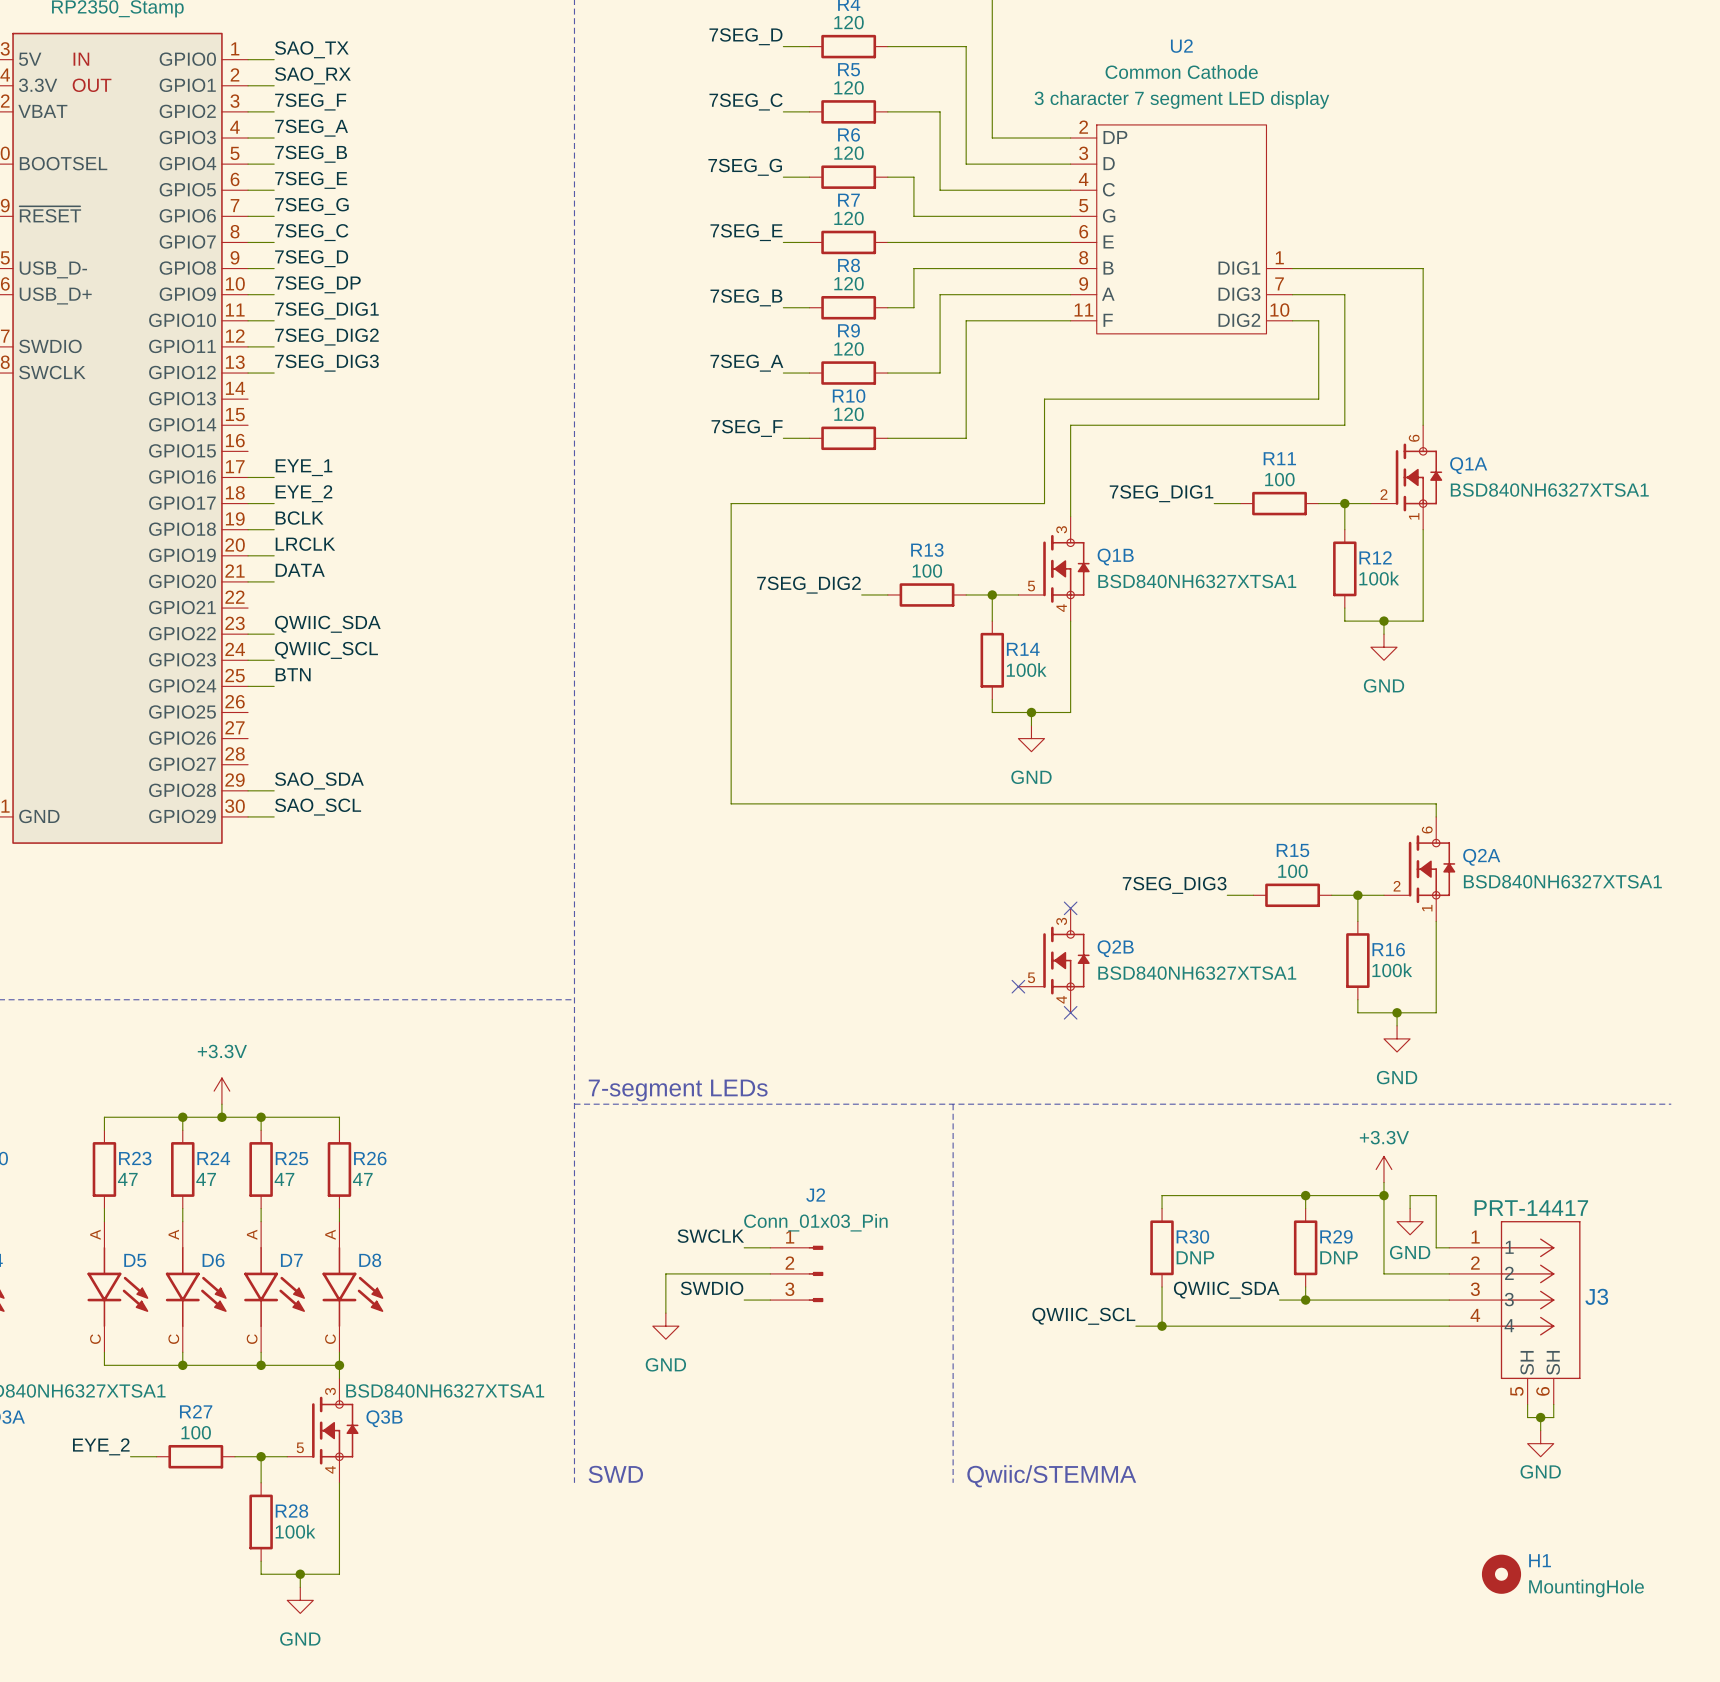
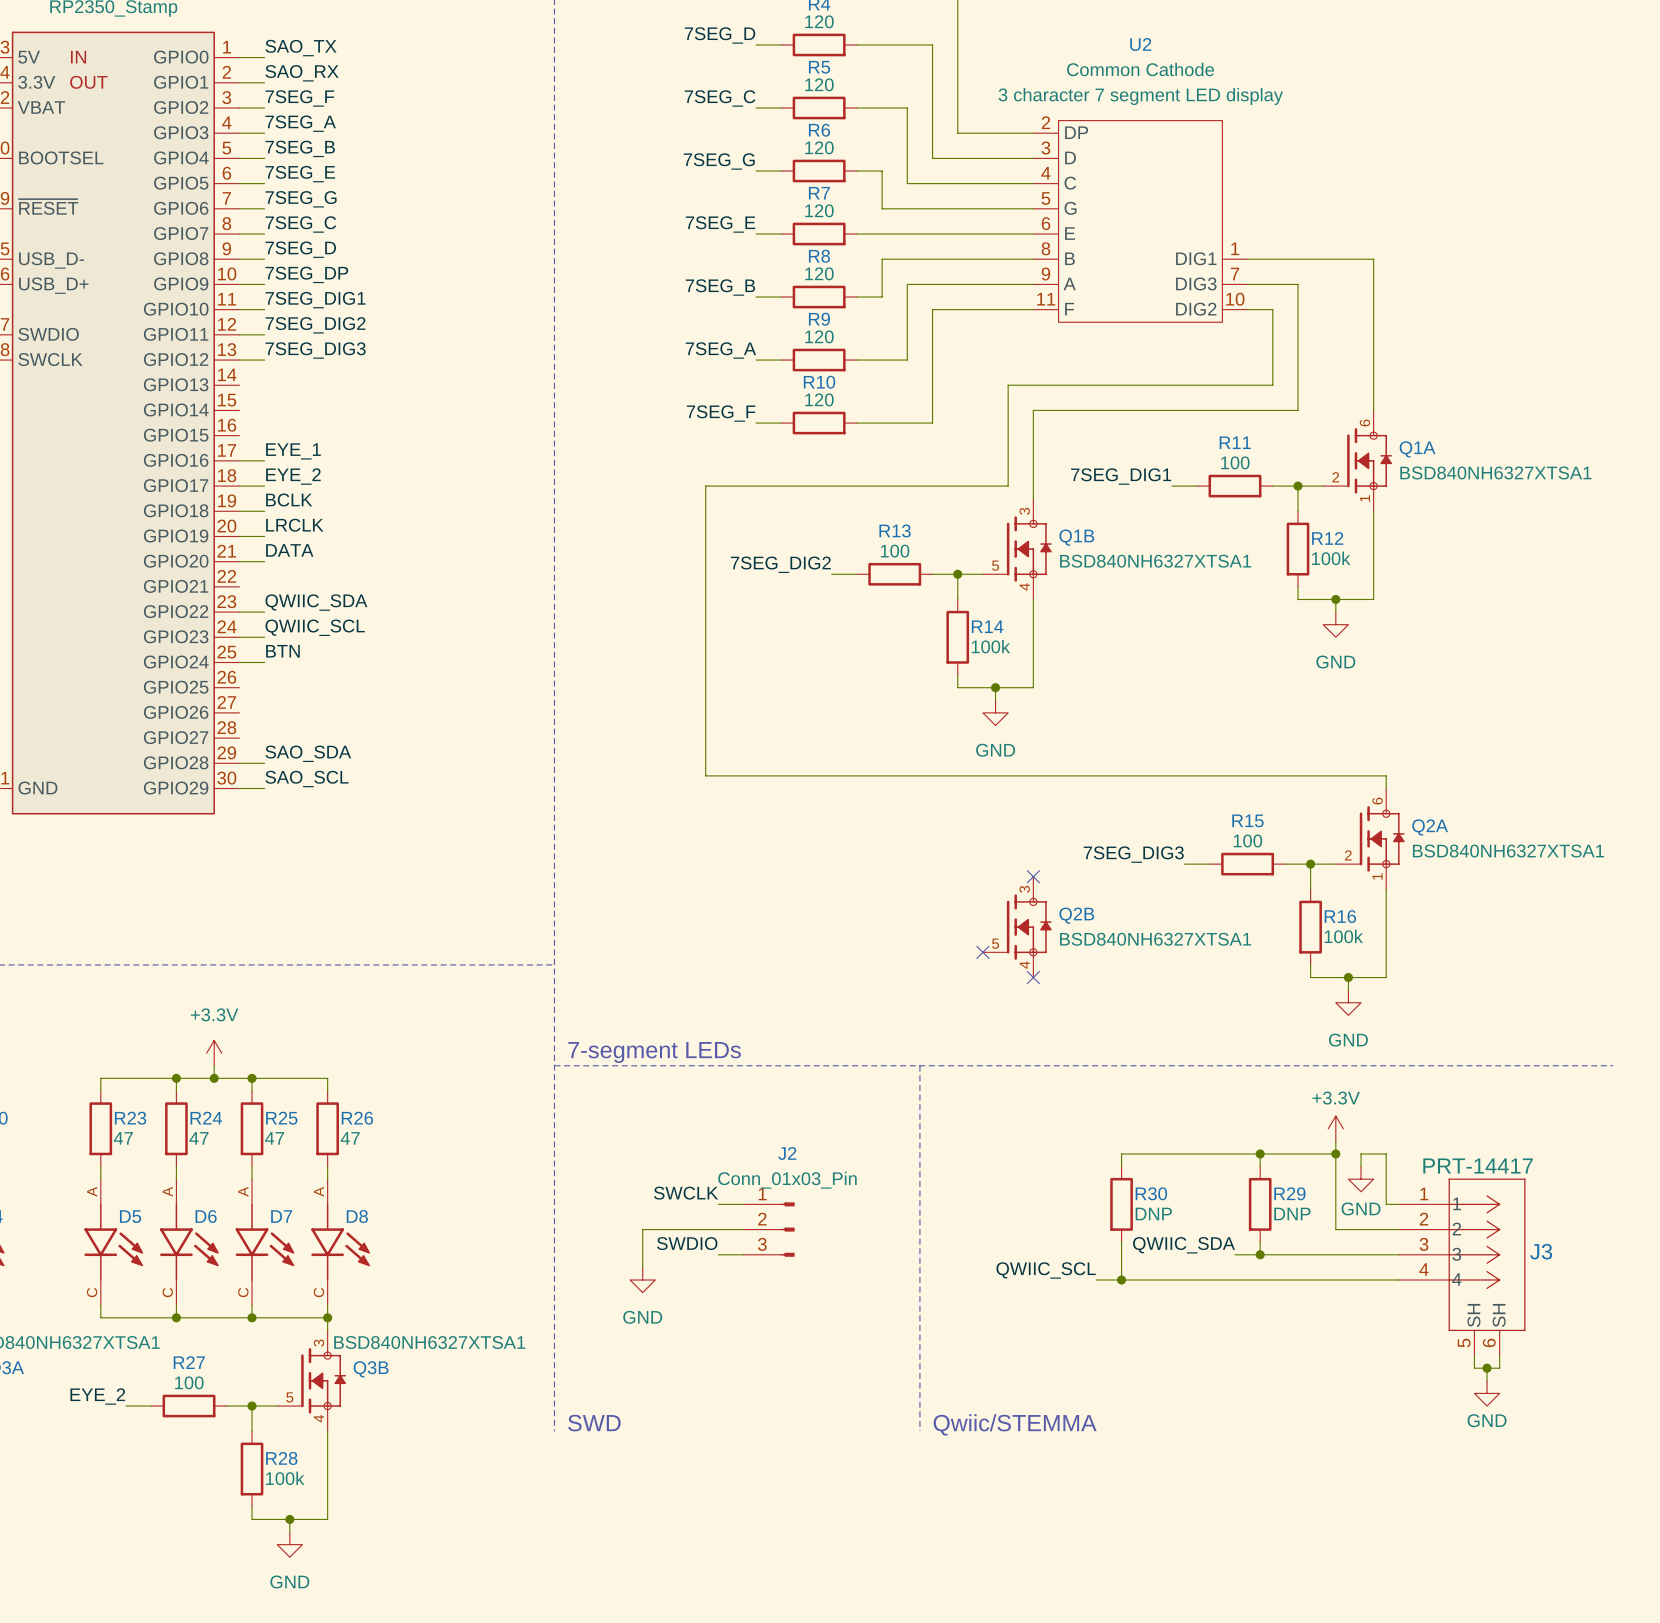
H1: MountingHole (1501, 1574) -> none

